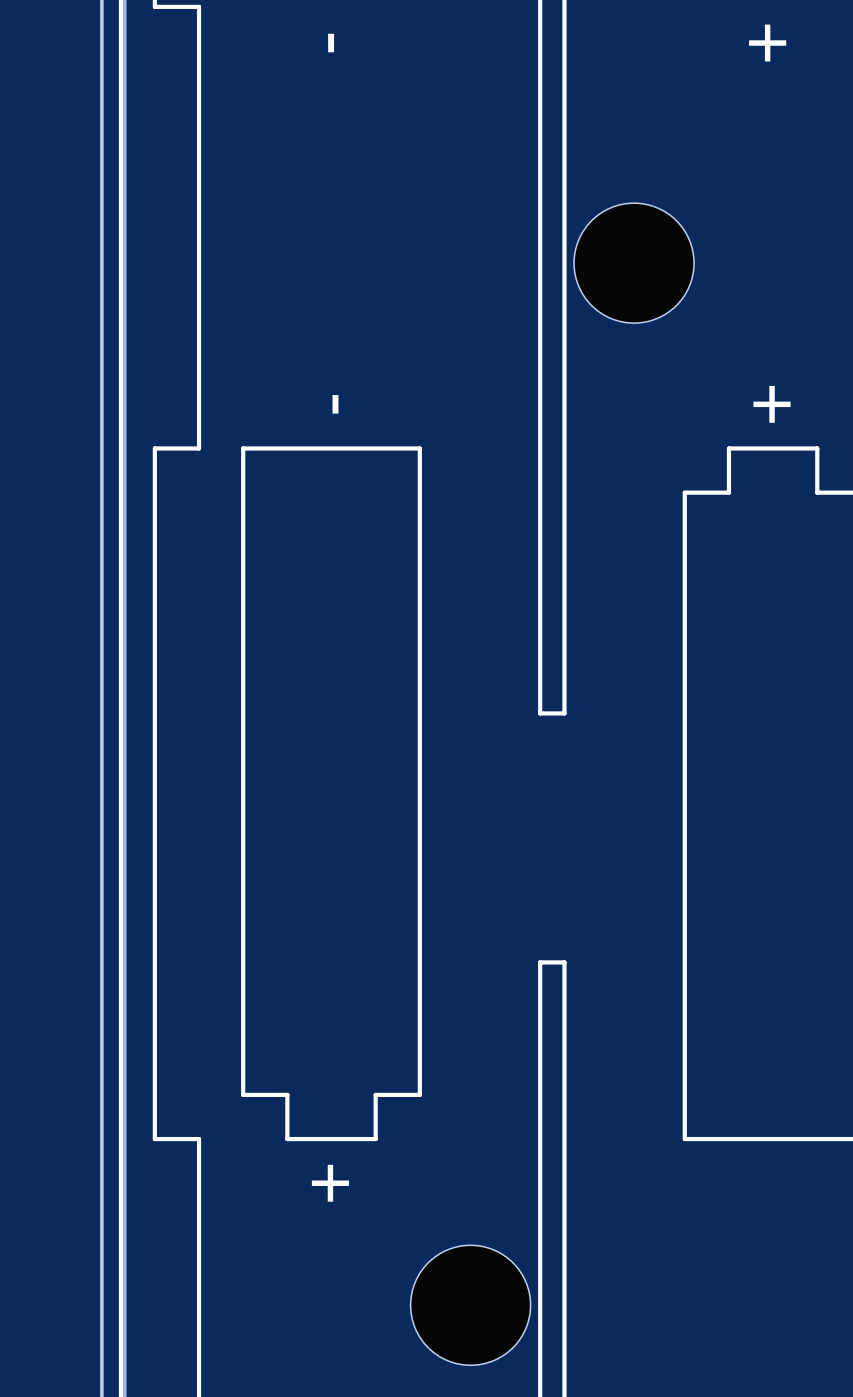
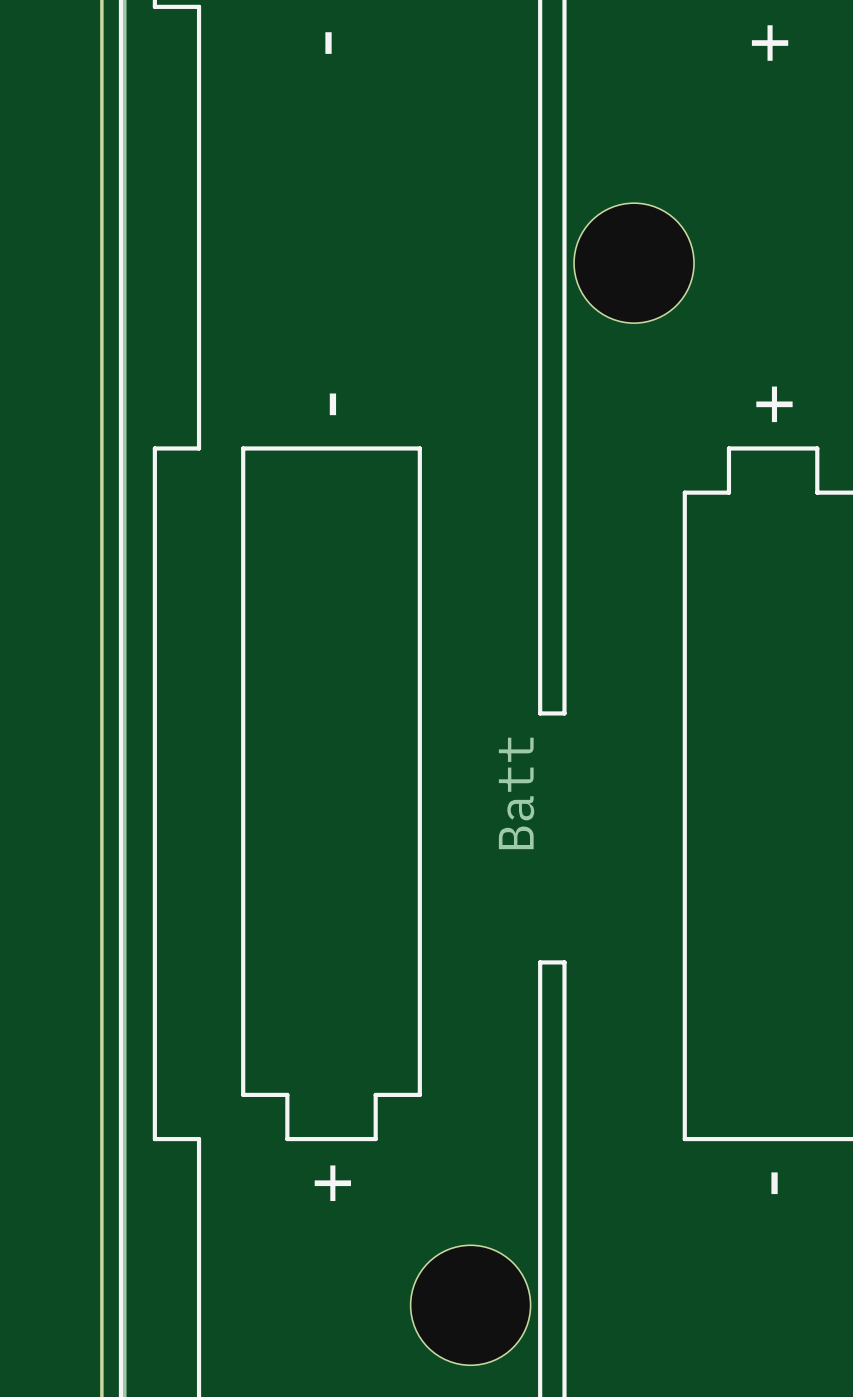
part value: none -> Batt (516, 793)
part text: none -> - (774, 1183)

